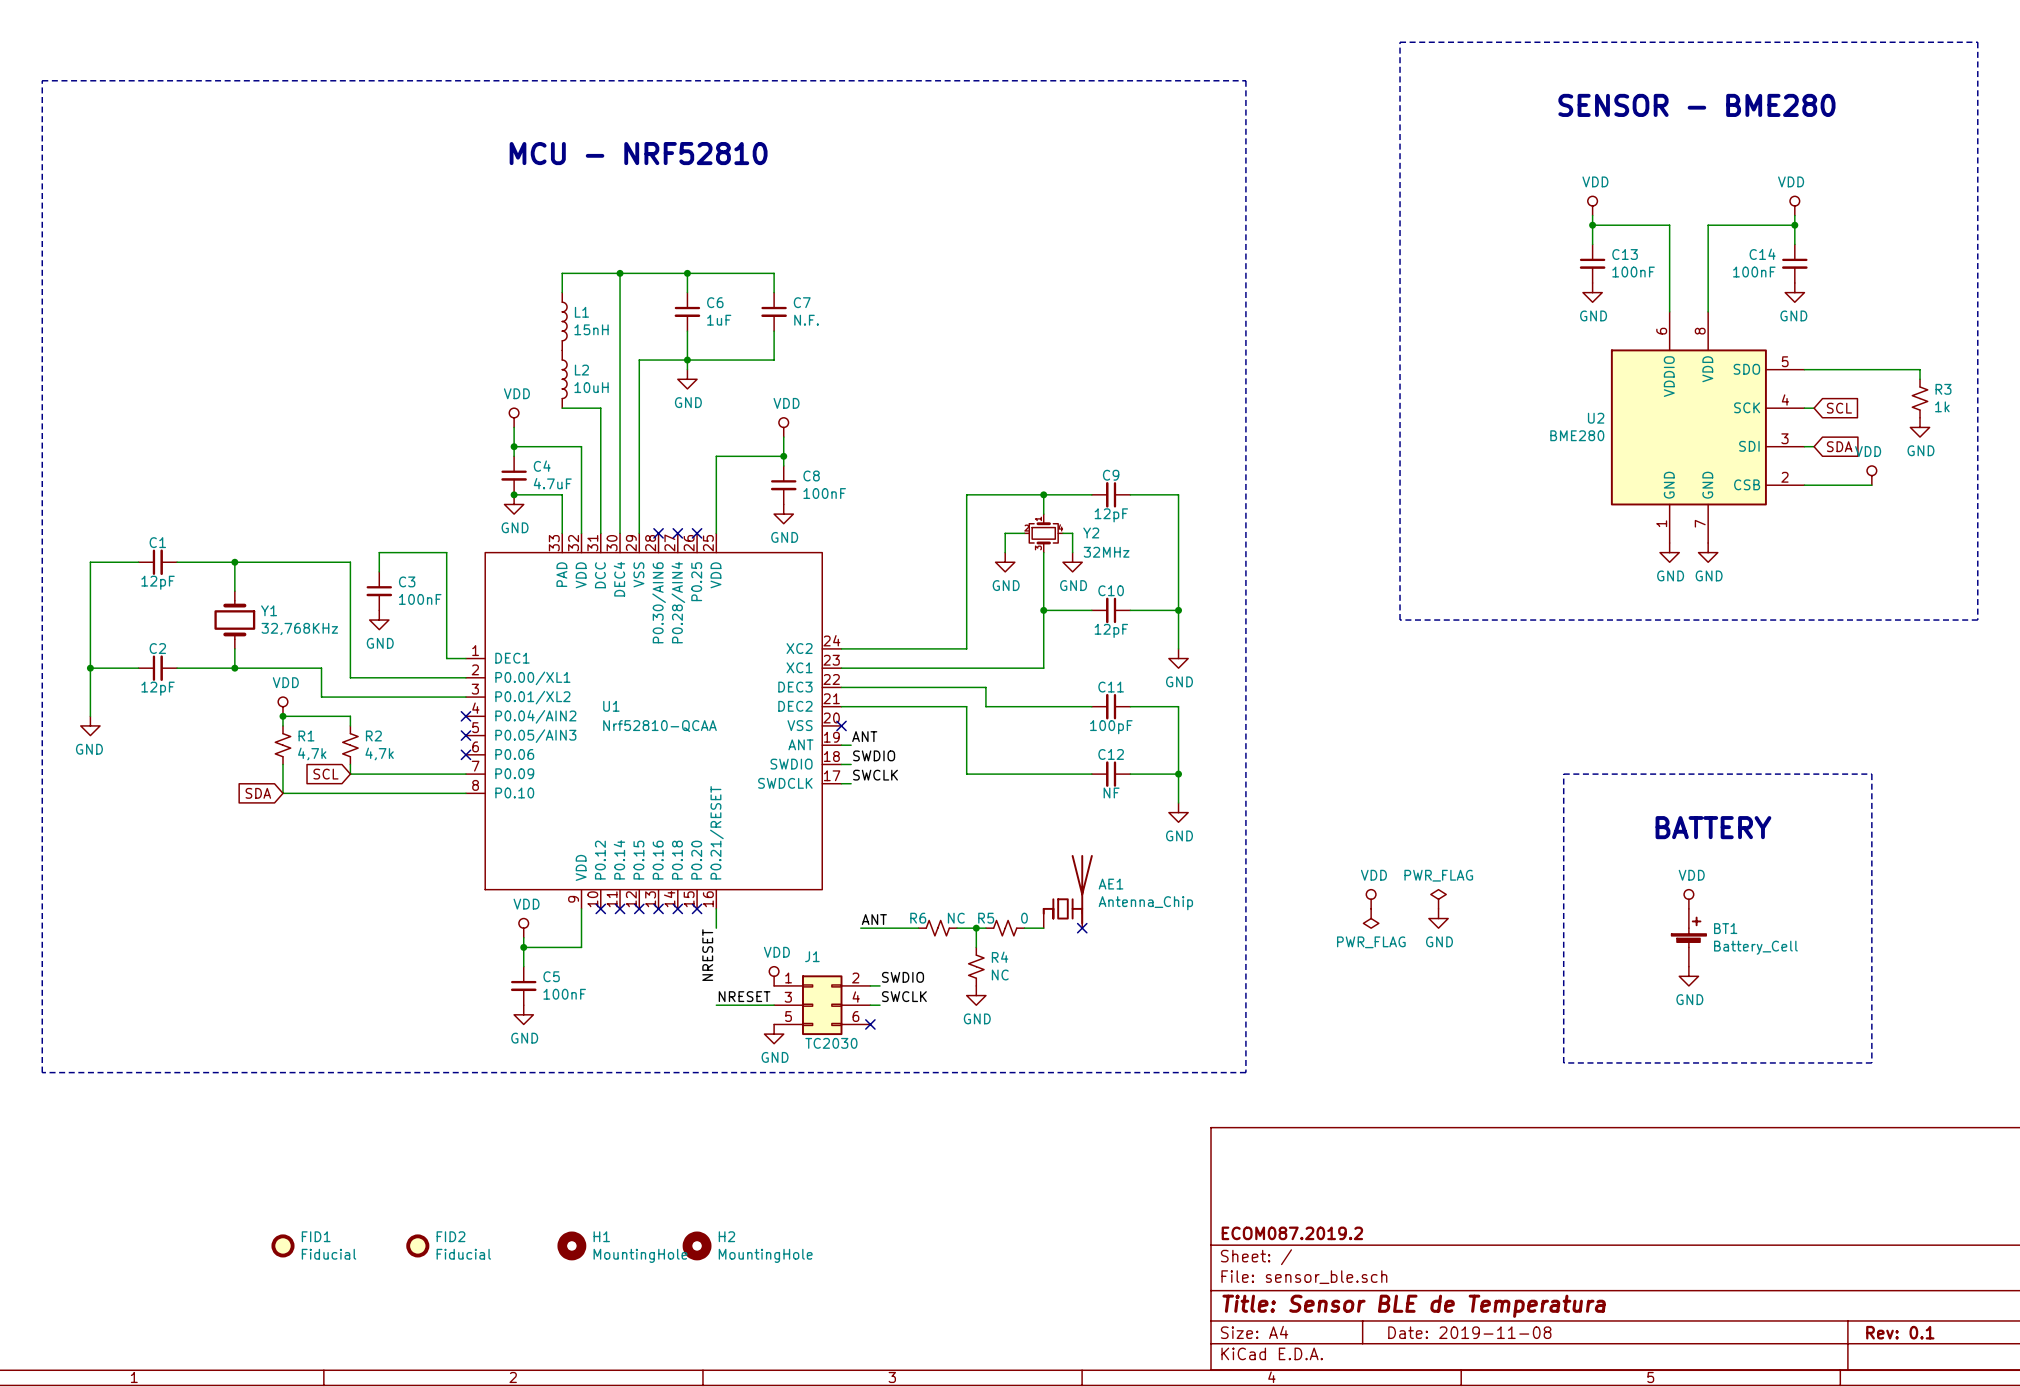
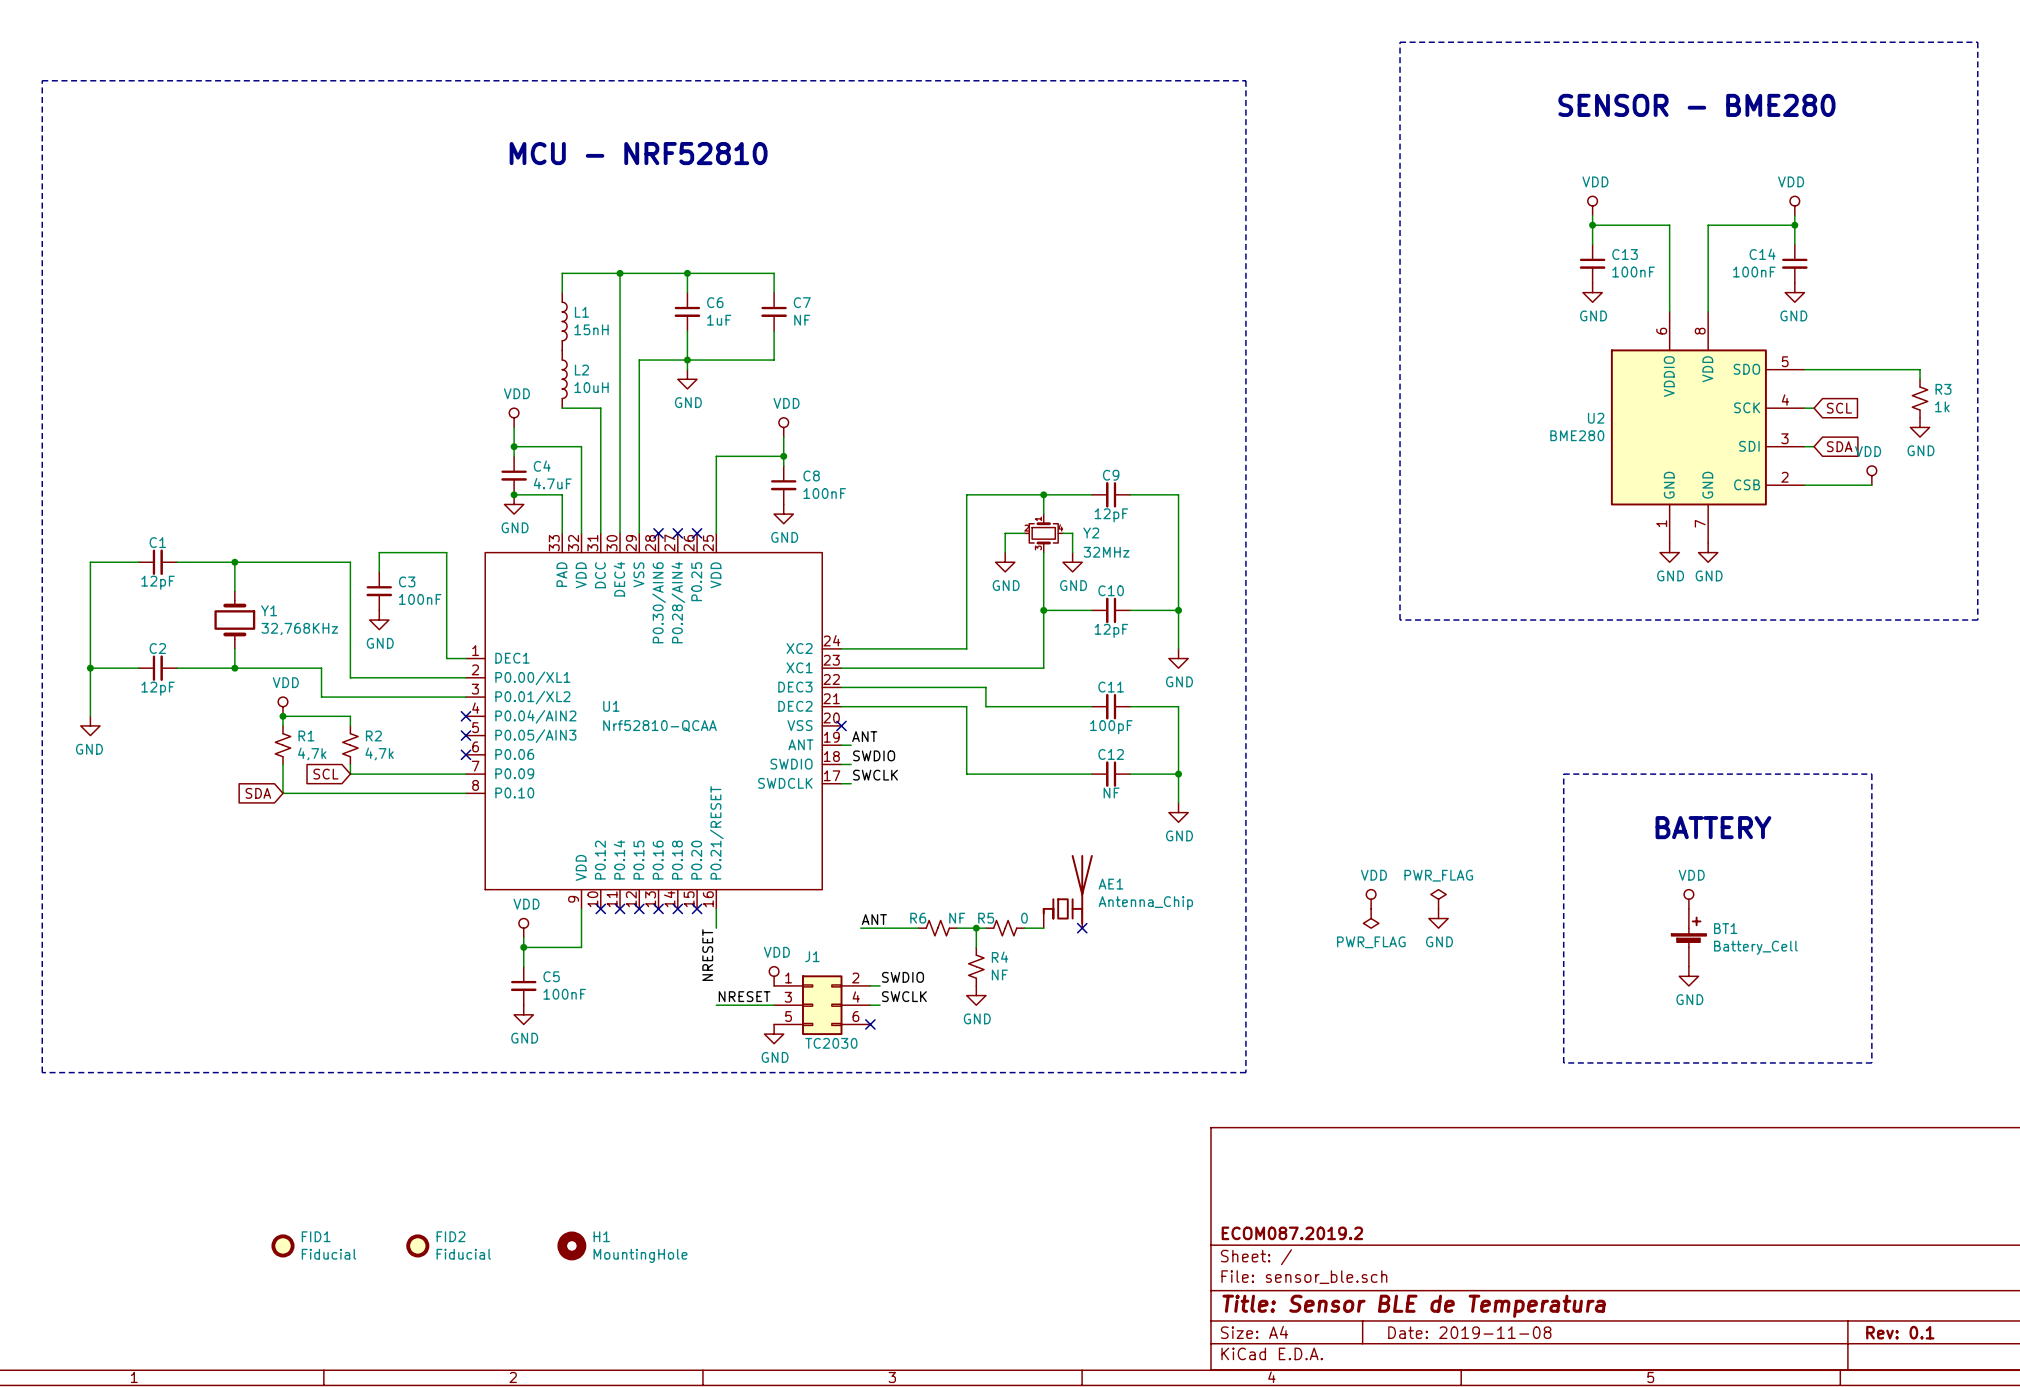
C7 value: N.F. (806, 320) -> NF (802, 320)
R6 value: NC (956, 918) -> NF (957, 918)
R4 value: NC (1000, 974) -> NF (999, 974)
H2: MountingHole (697, 1245) -> none

